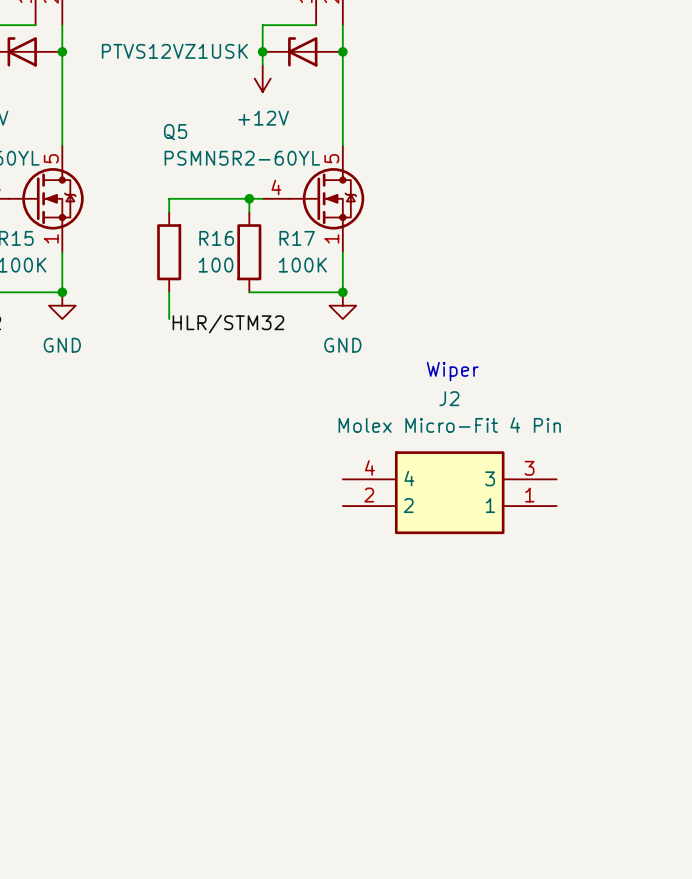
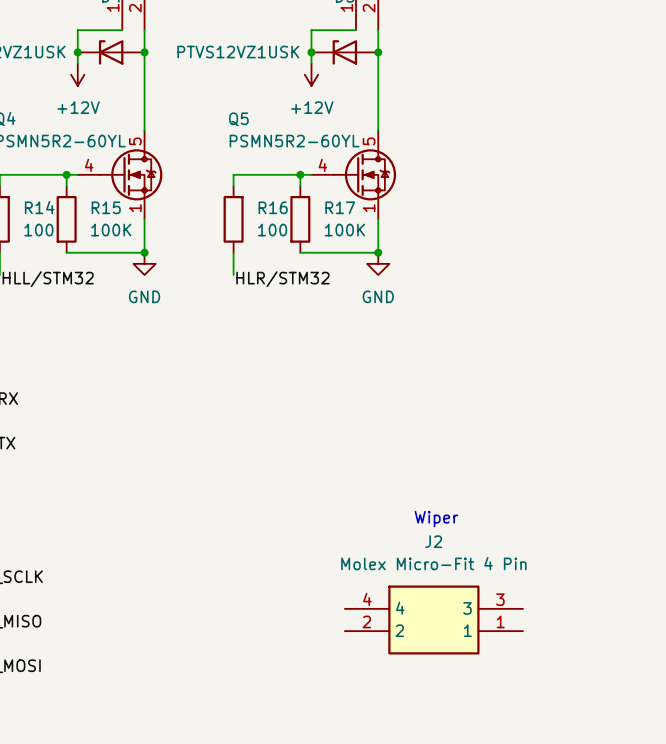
text position: Wiper (452, 371) -> Wiper (436, 519)
J2 position: (449, 492) -> (433, 619)

